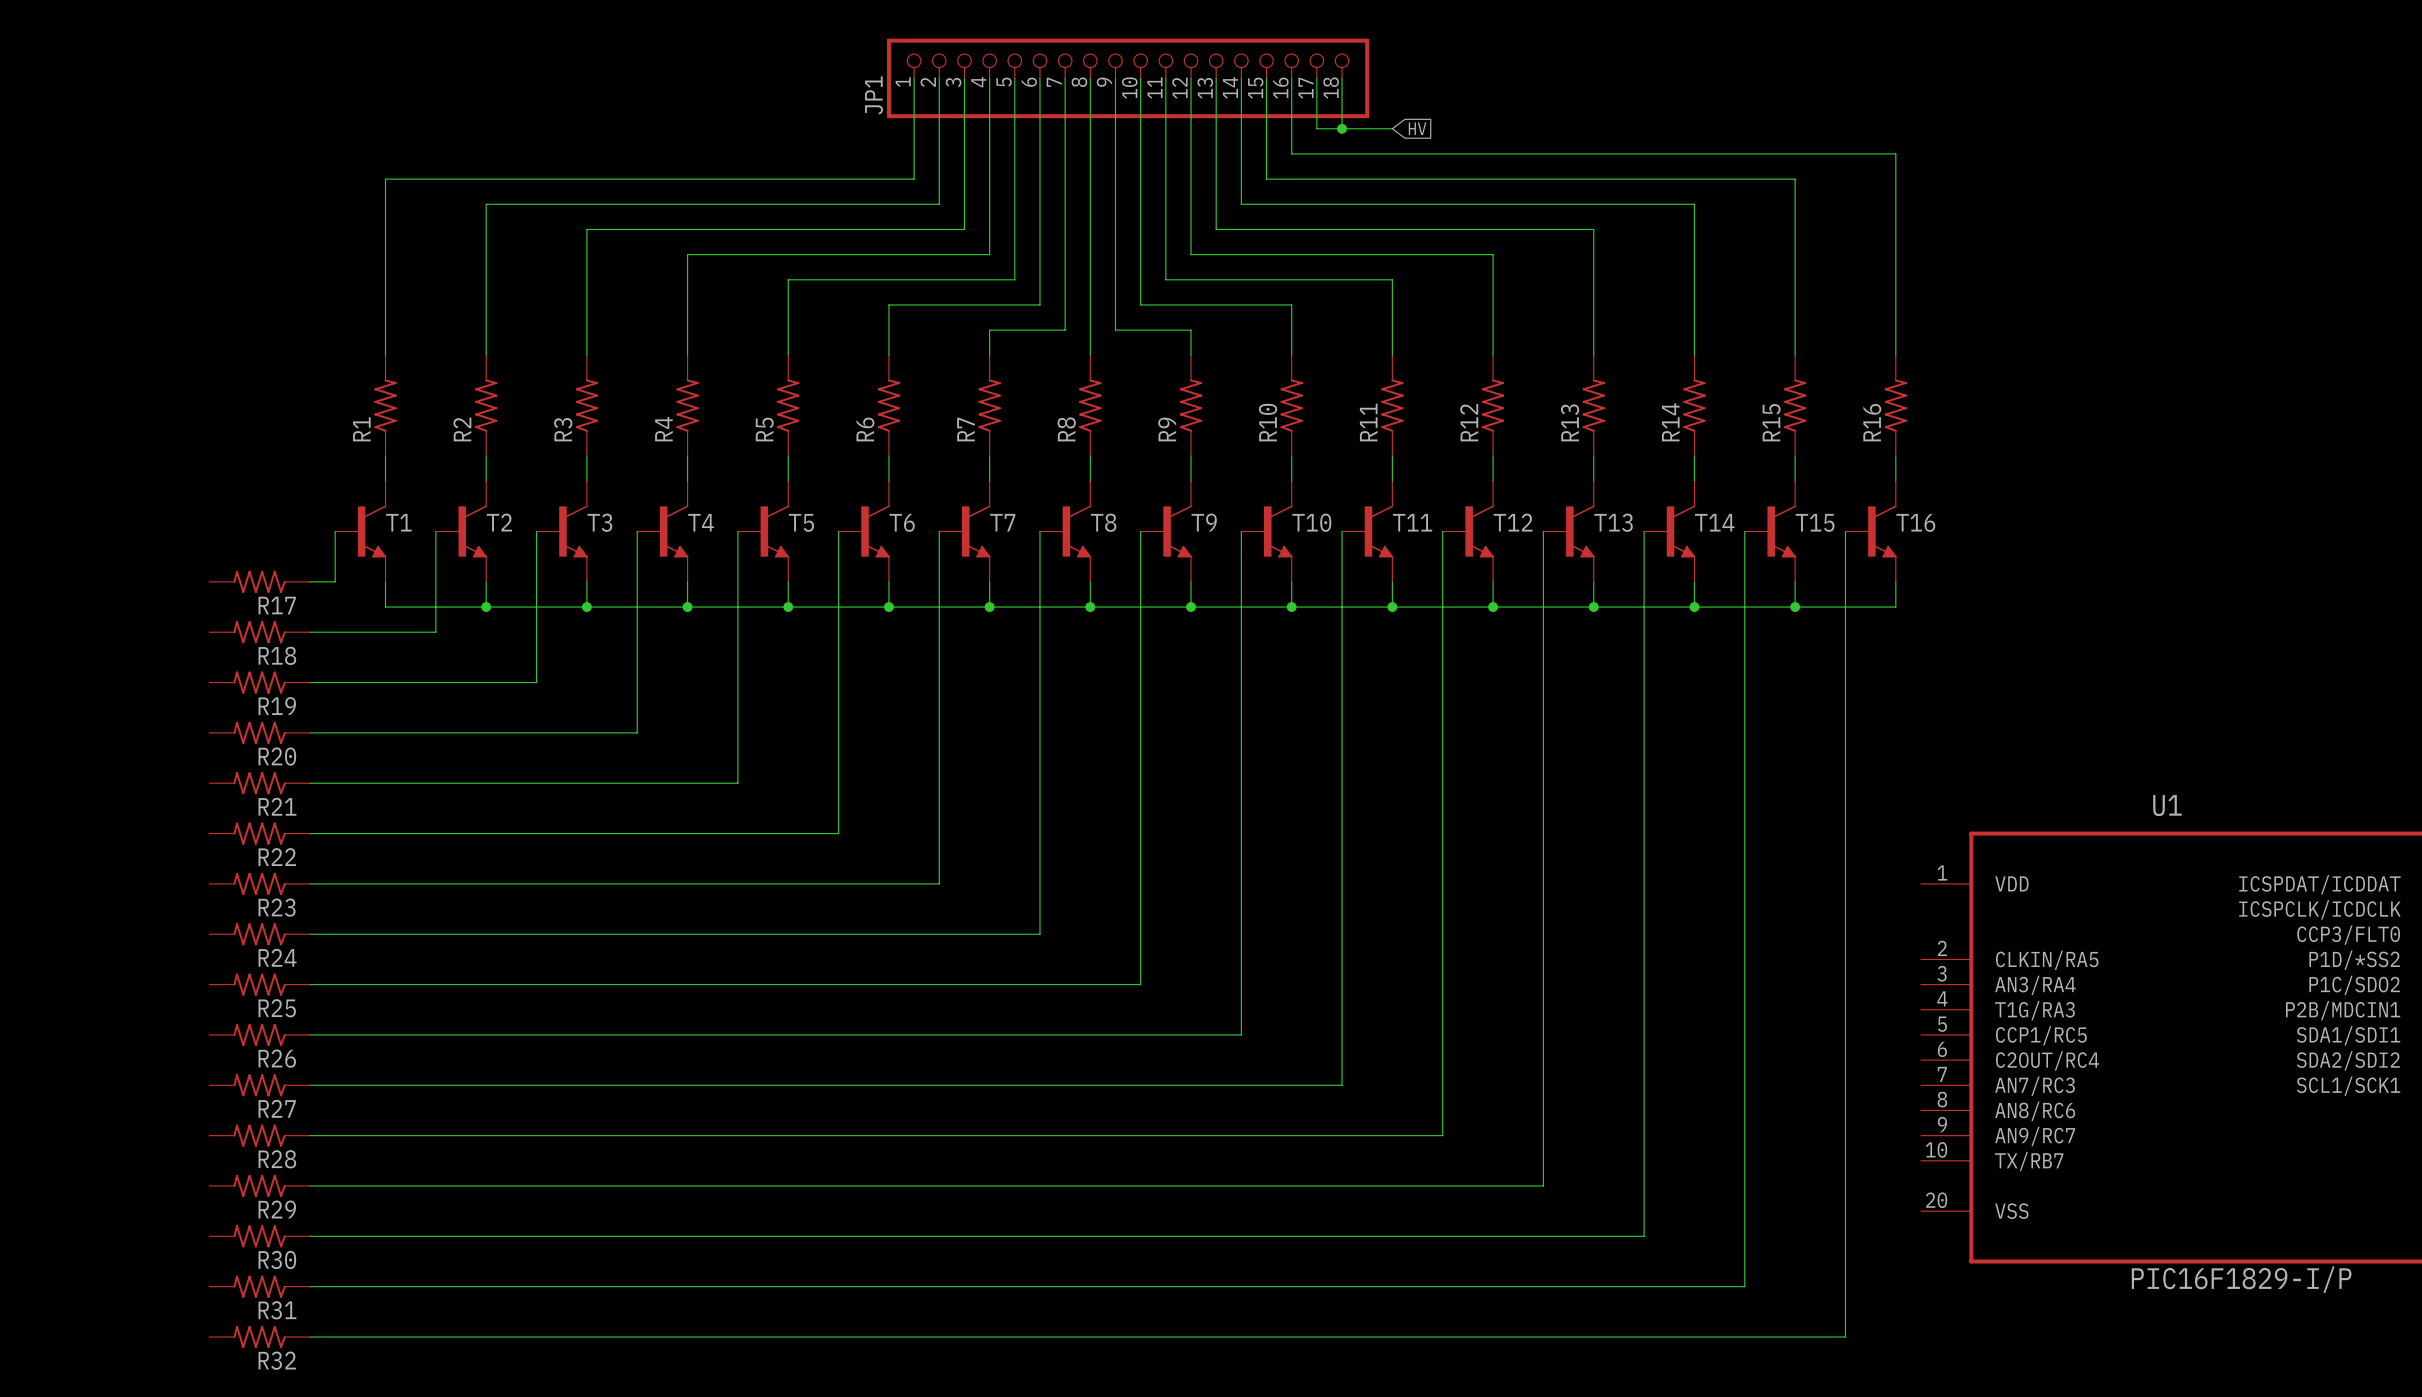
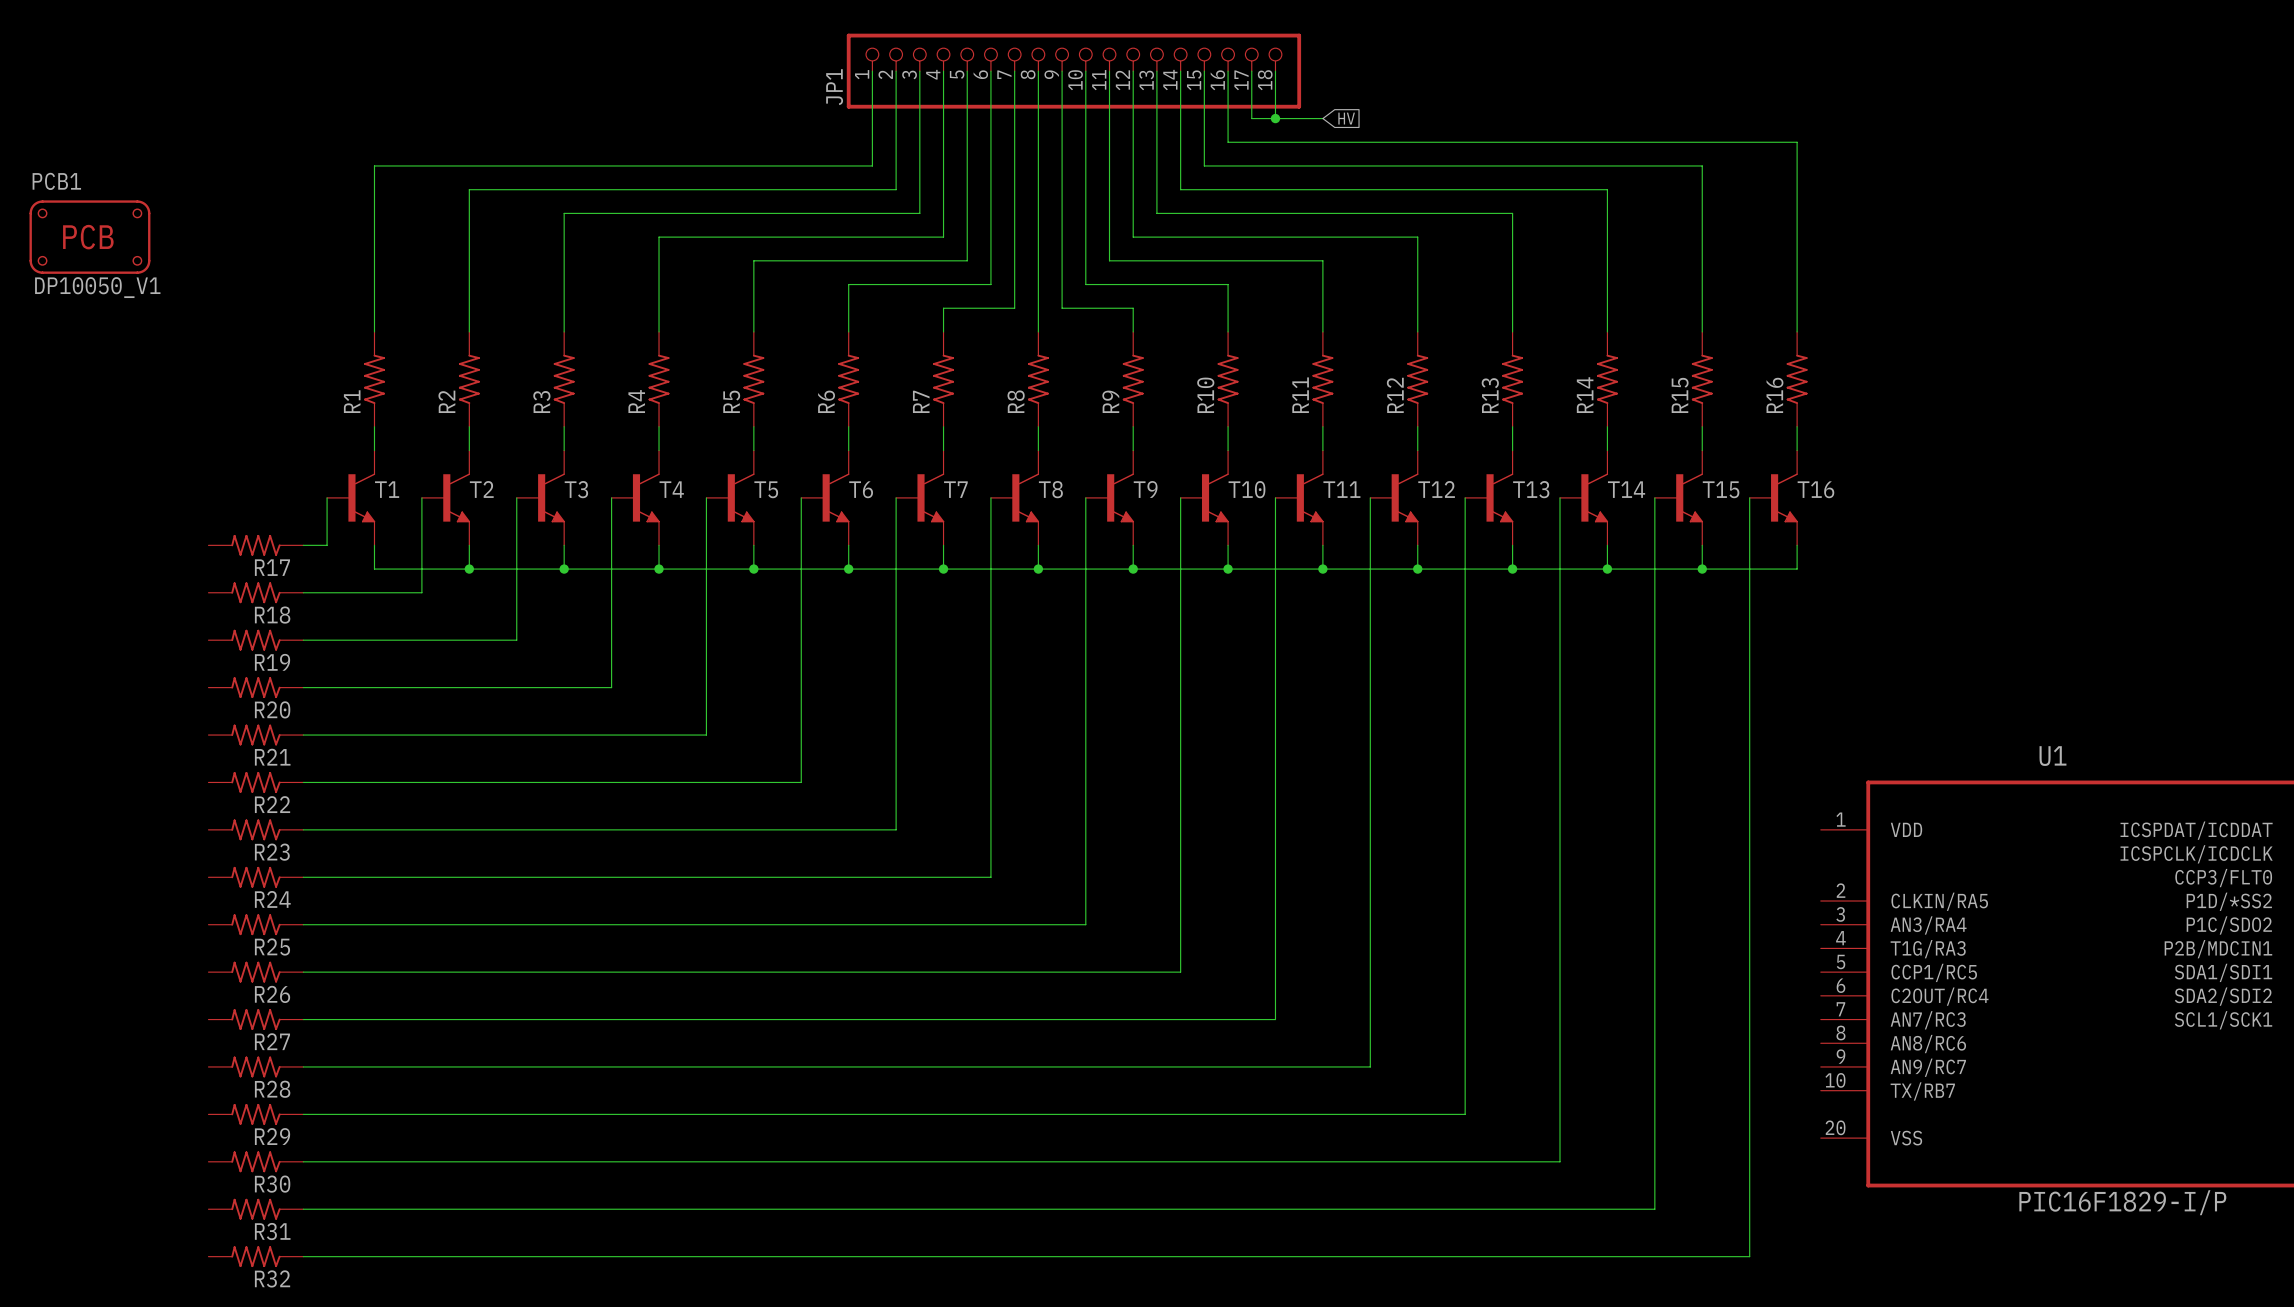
PCB1: none -> (89, 237)

